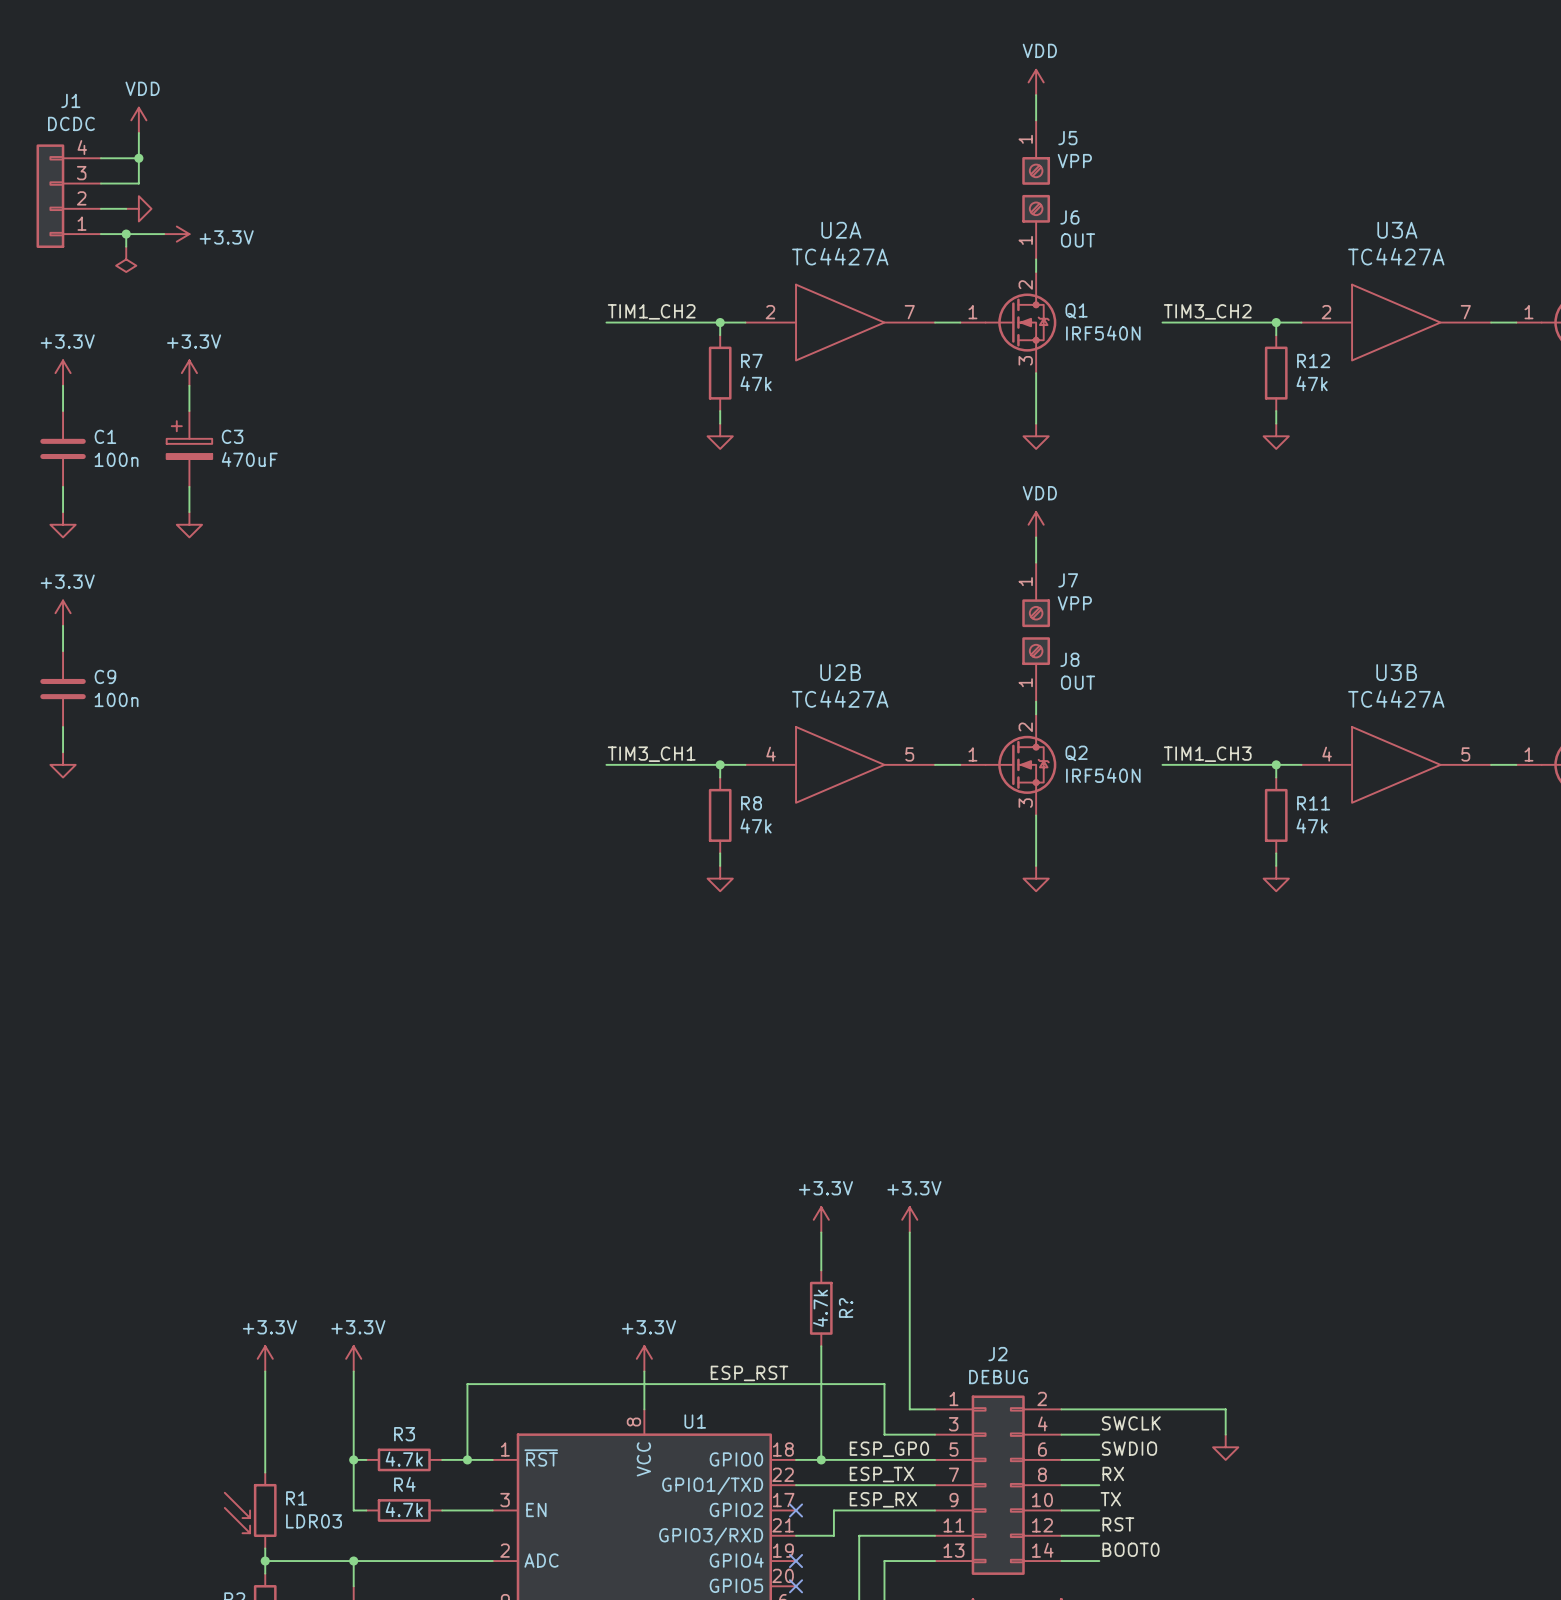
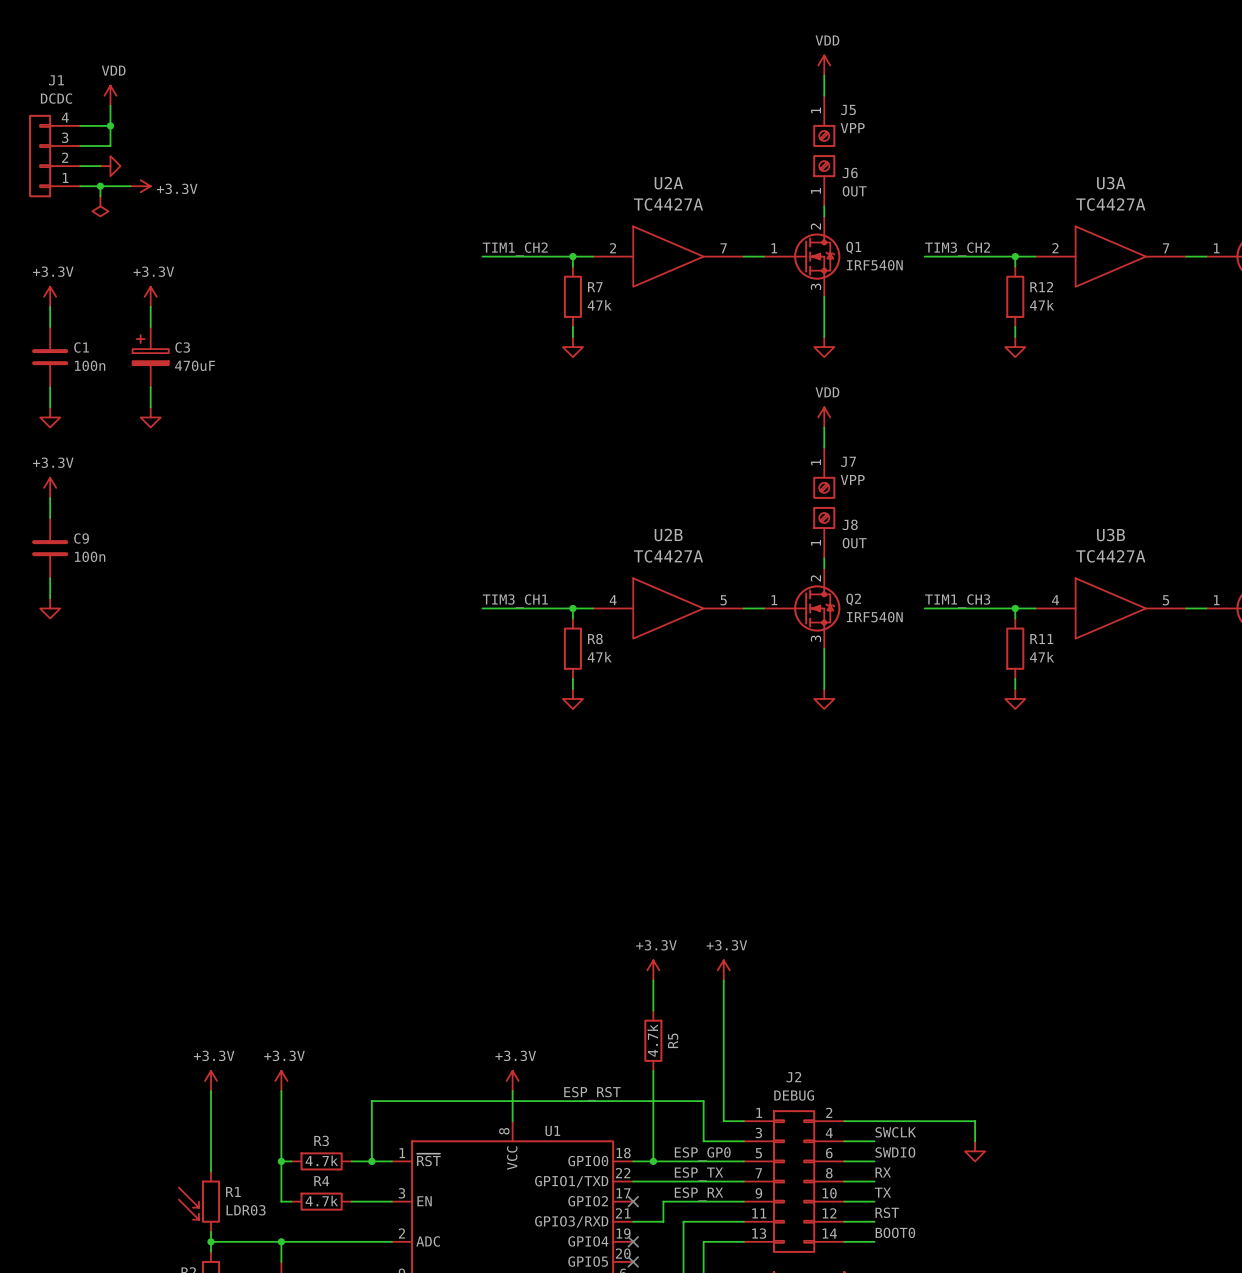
R? name: R? (846, 1307) -> R5 (673, 1040)

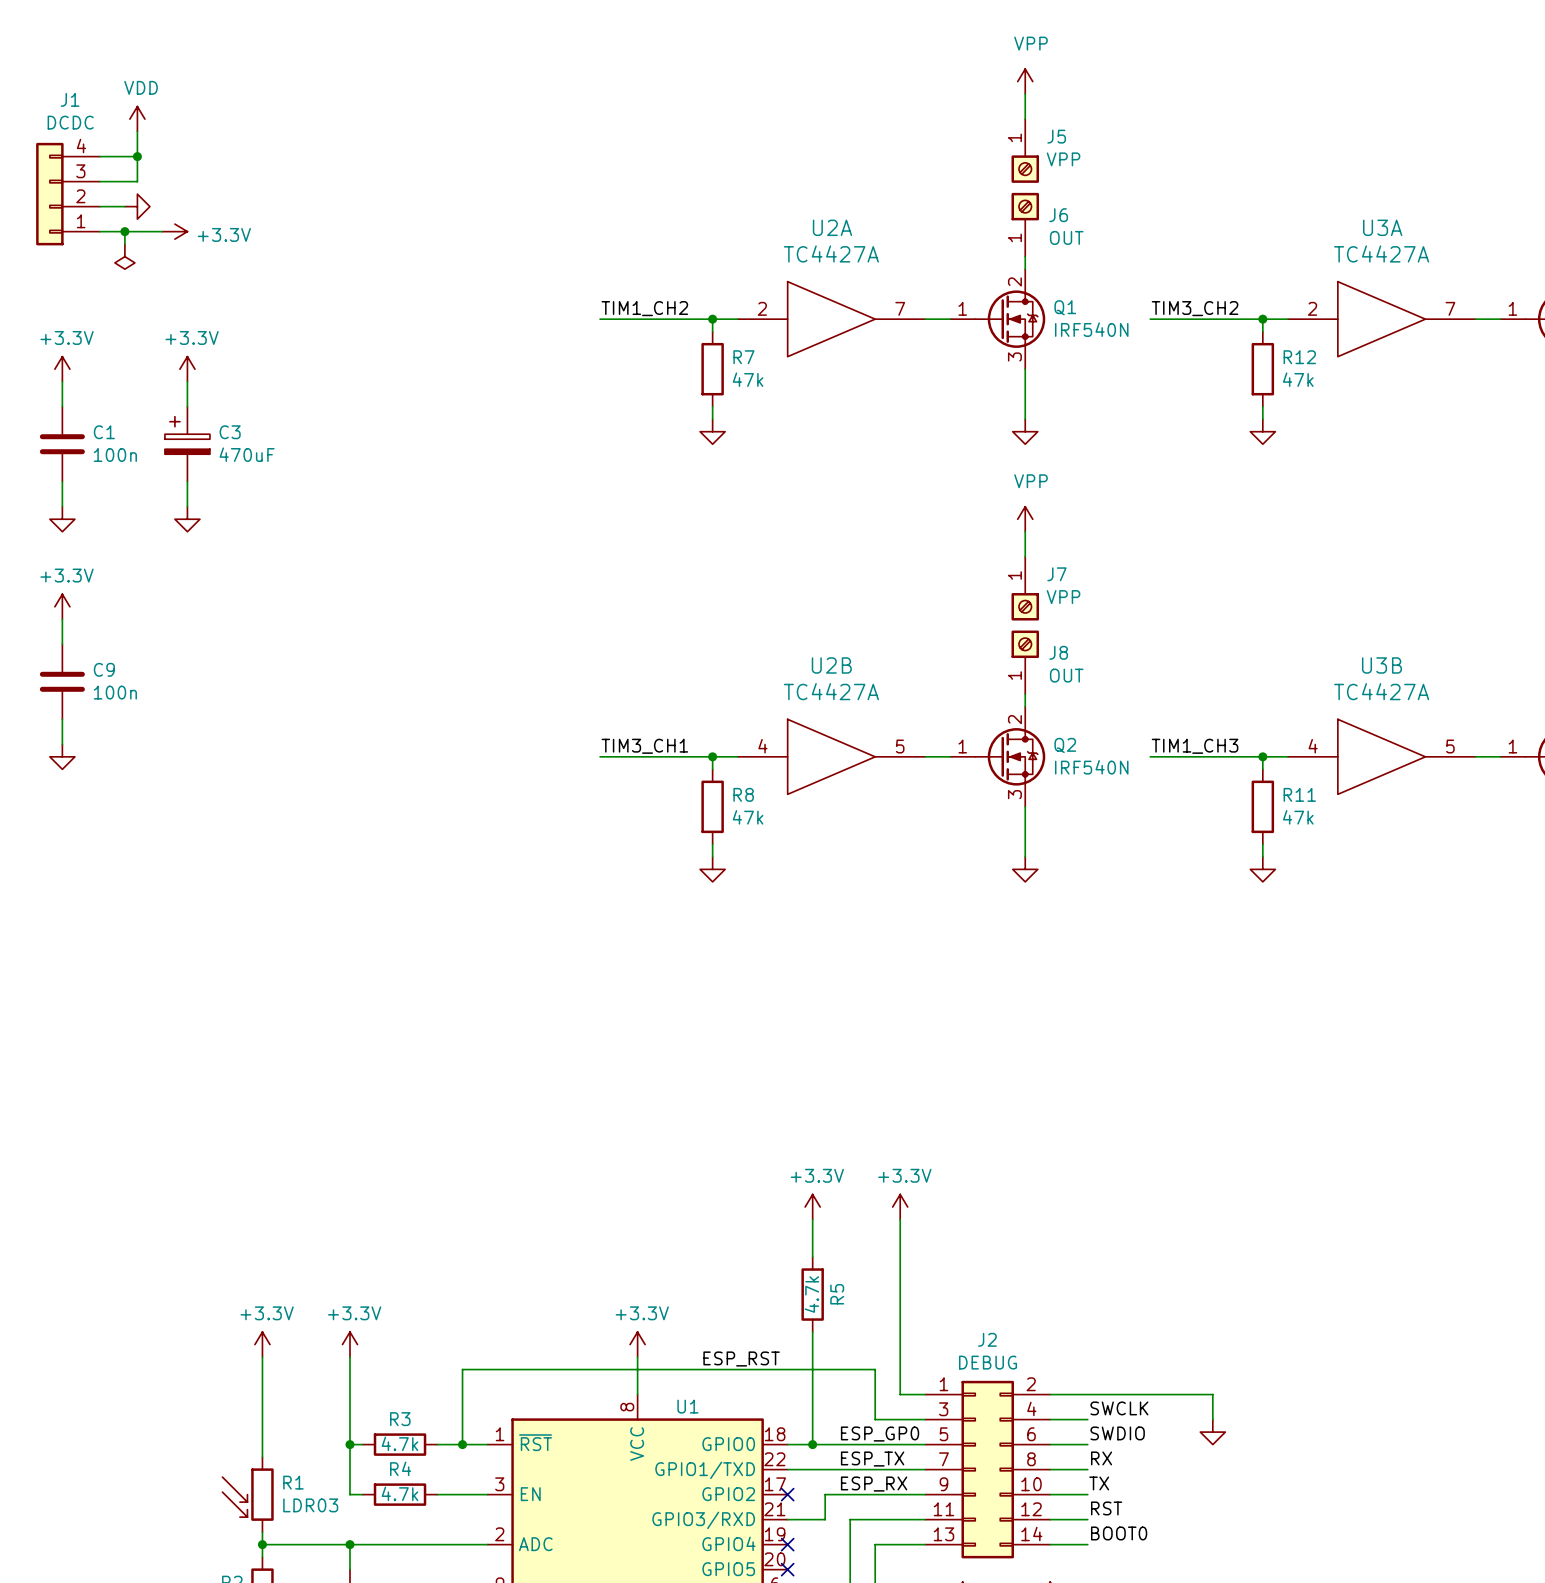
power symbol: VDD (824, 65) -> VPP (1025, 81)
power symbol: VDD (824, 417) -> VPP (1025, 519)

